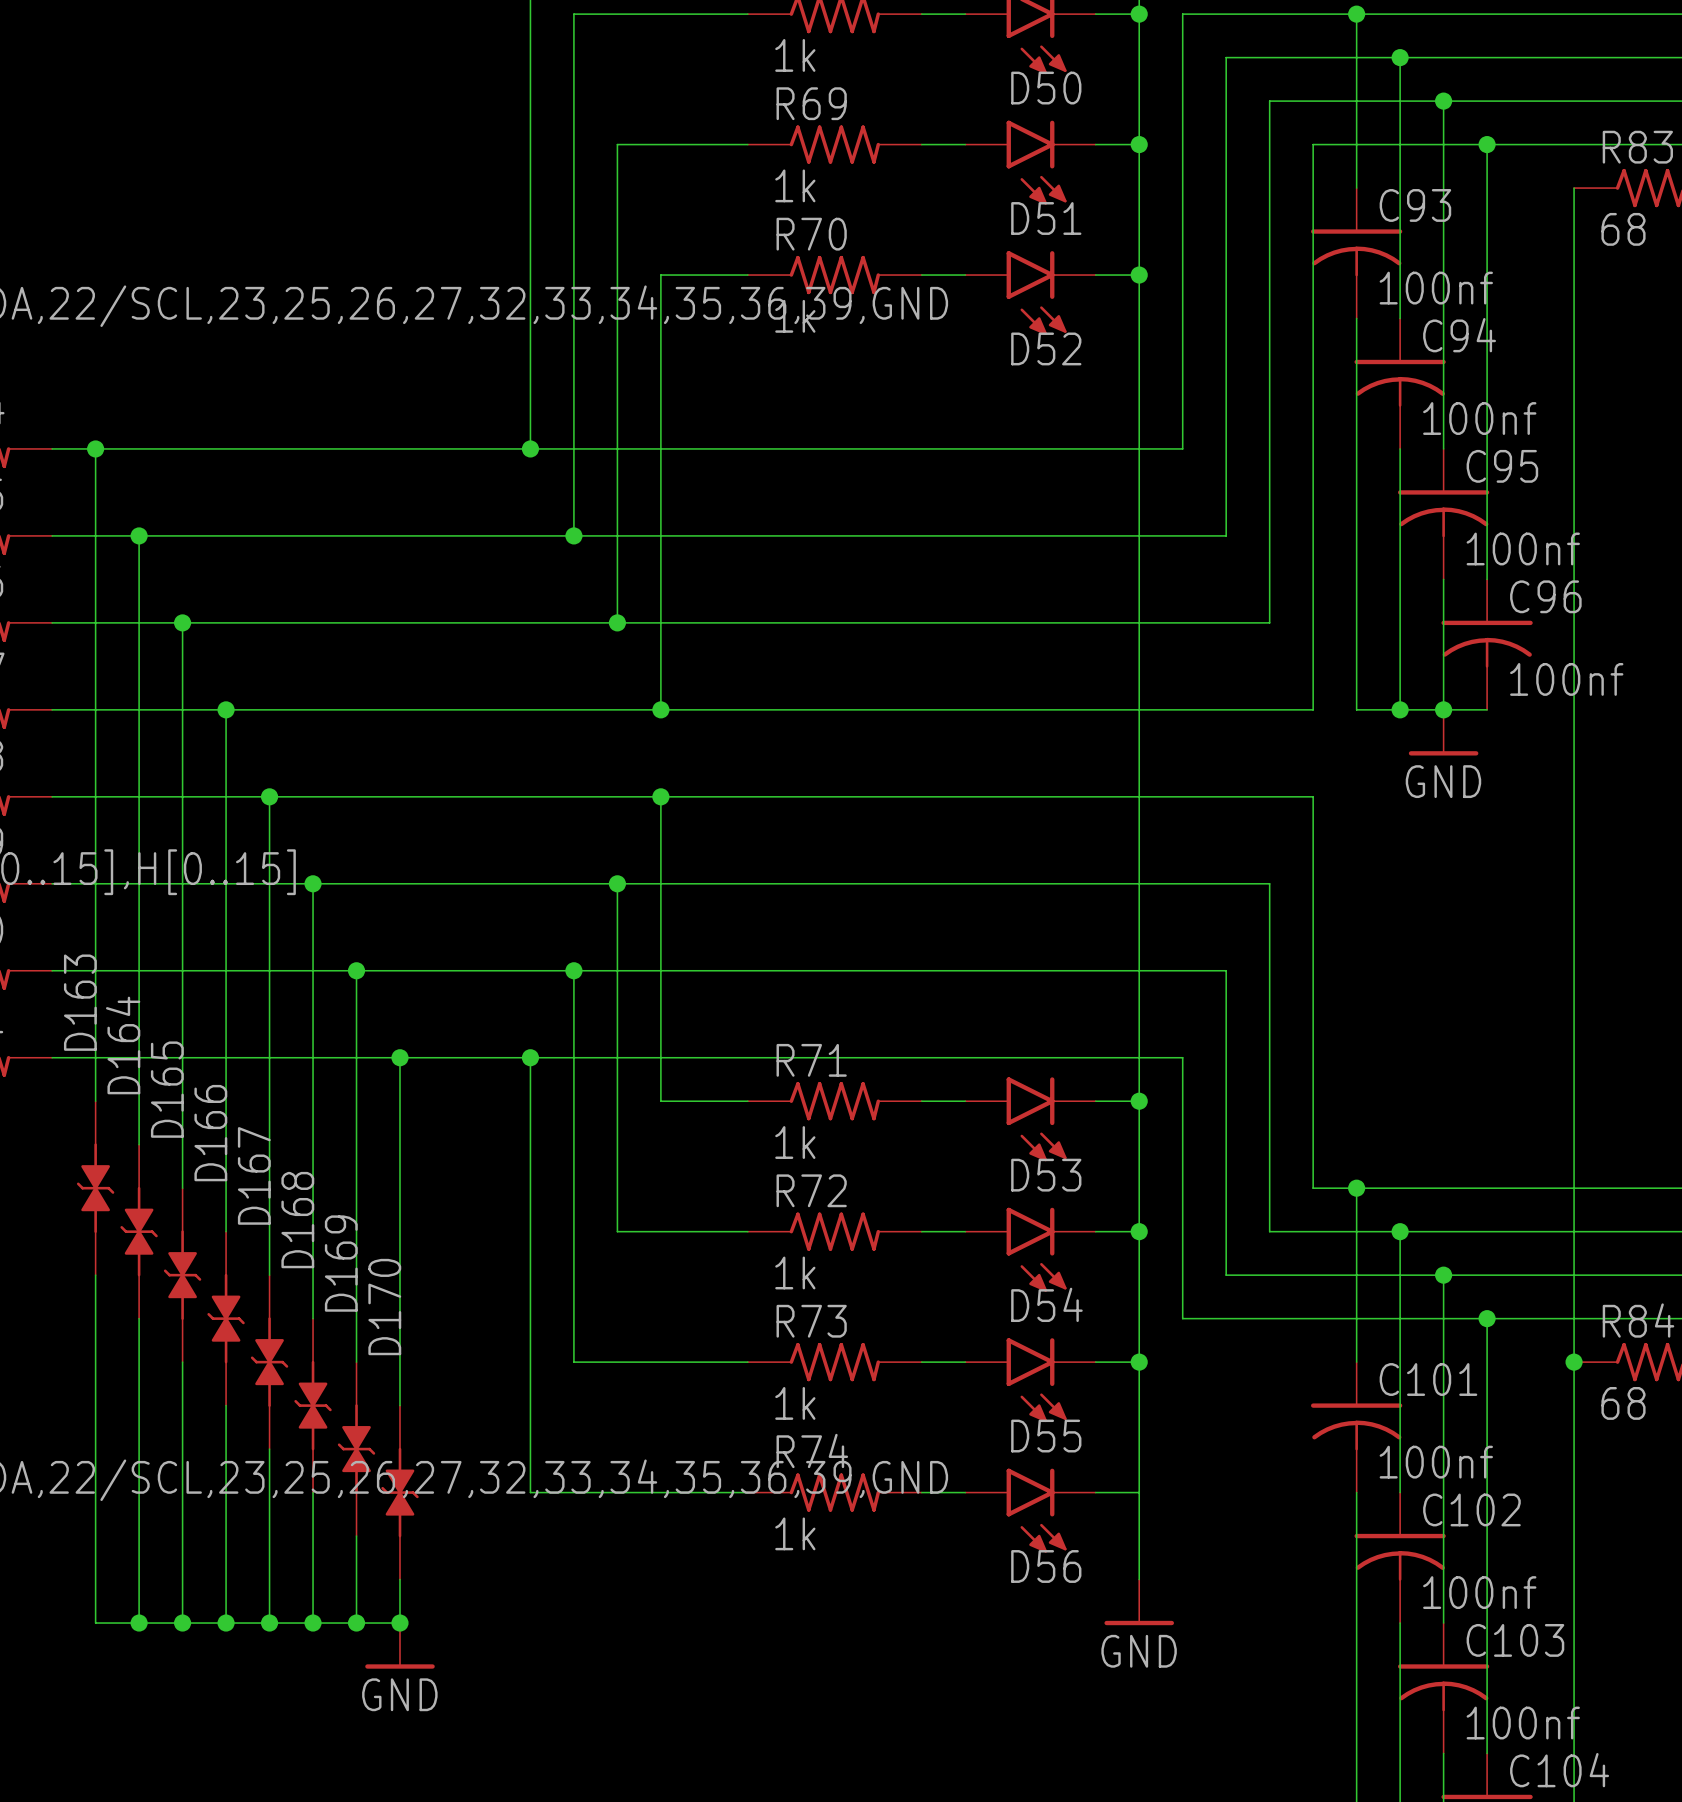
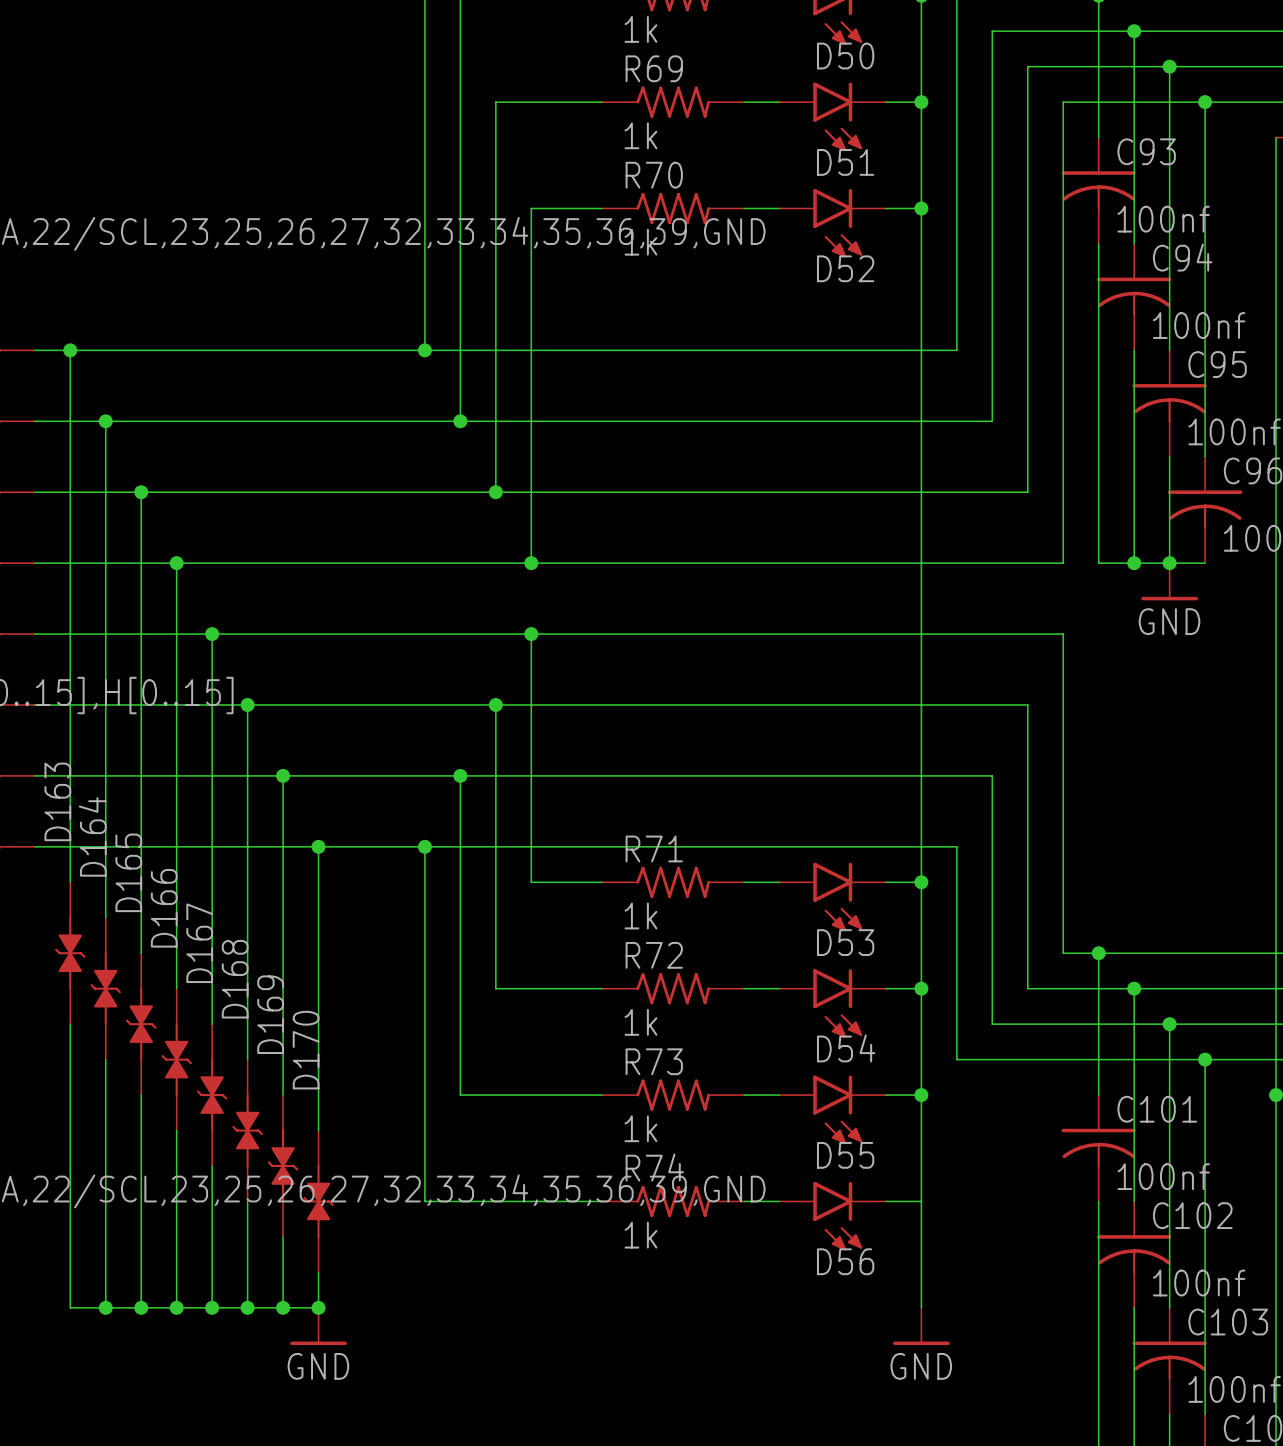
power symbol position: GND (1139, 1602) -> GND (921, 1326)

